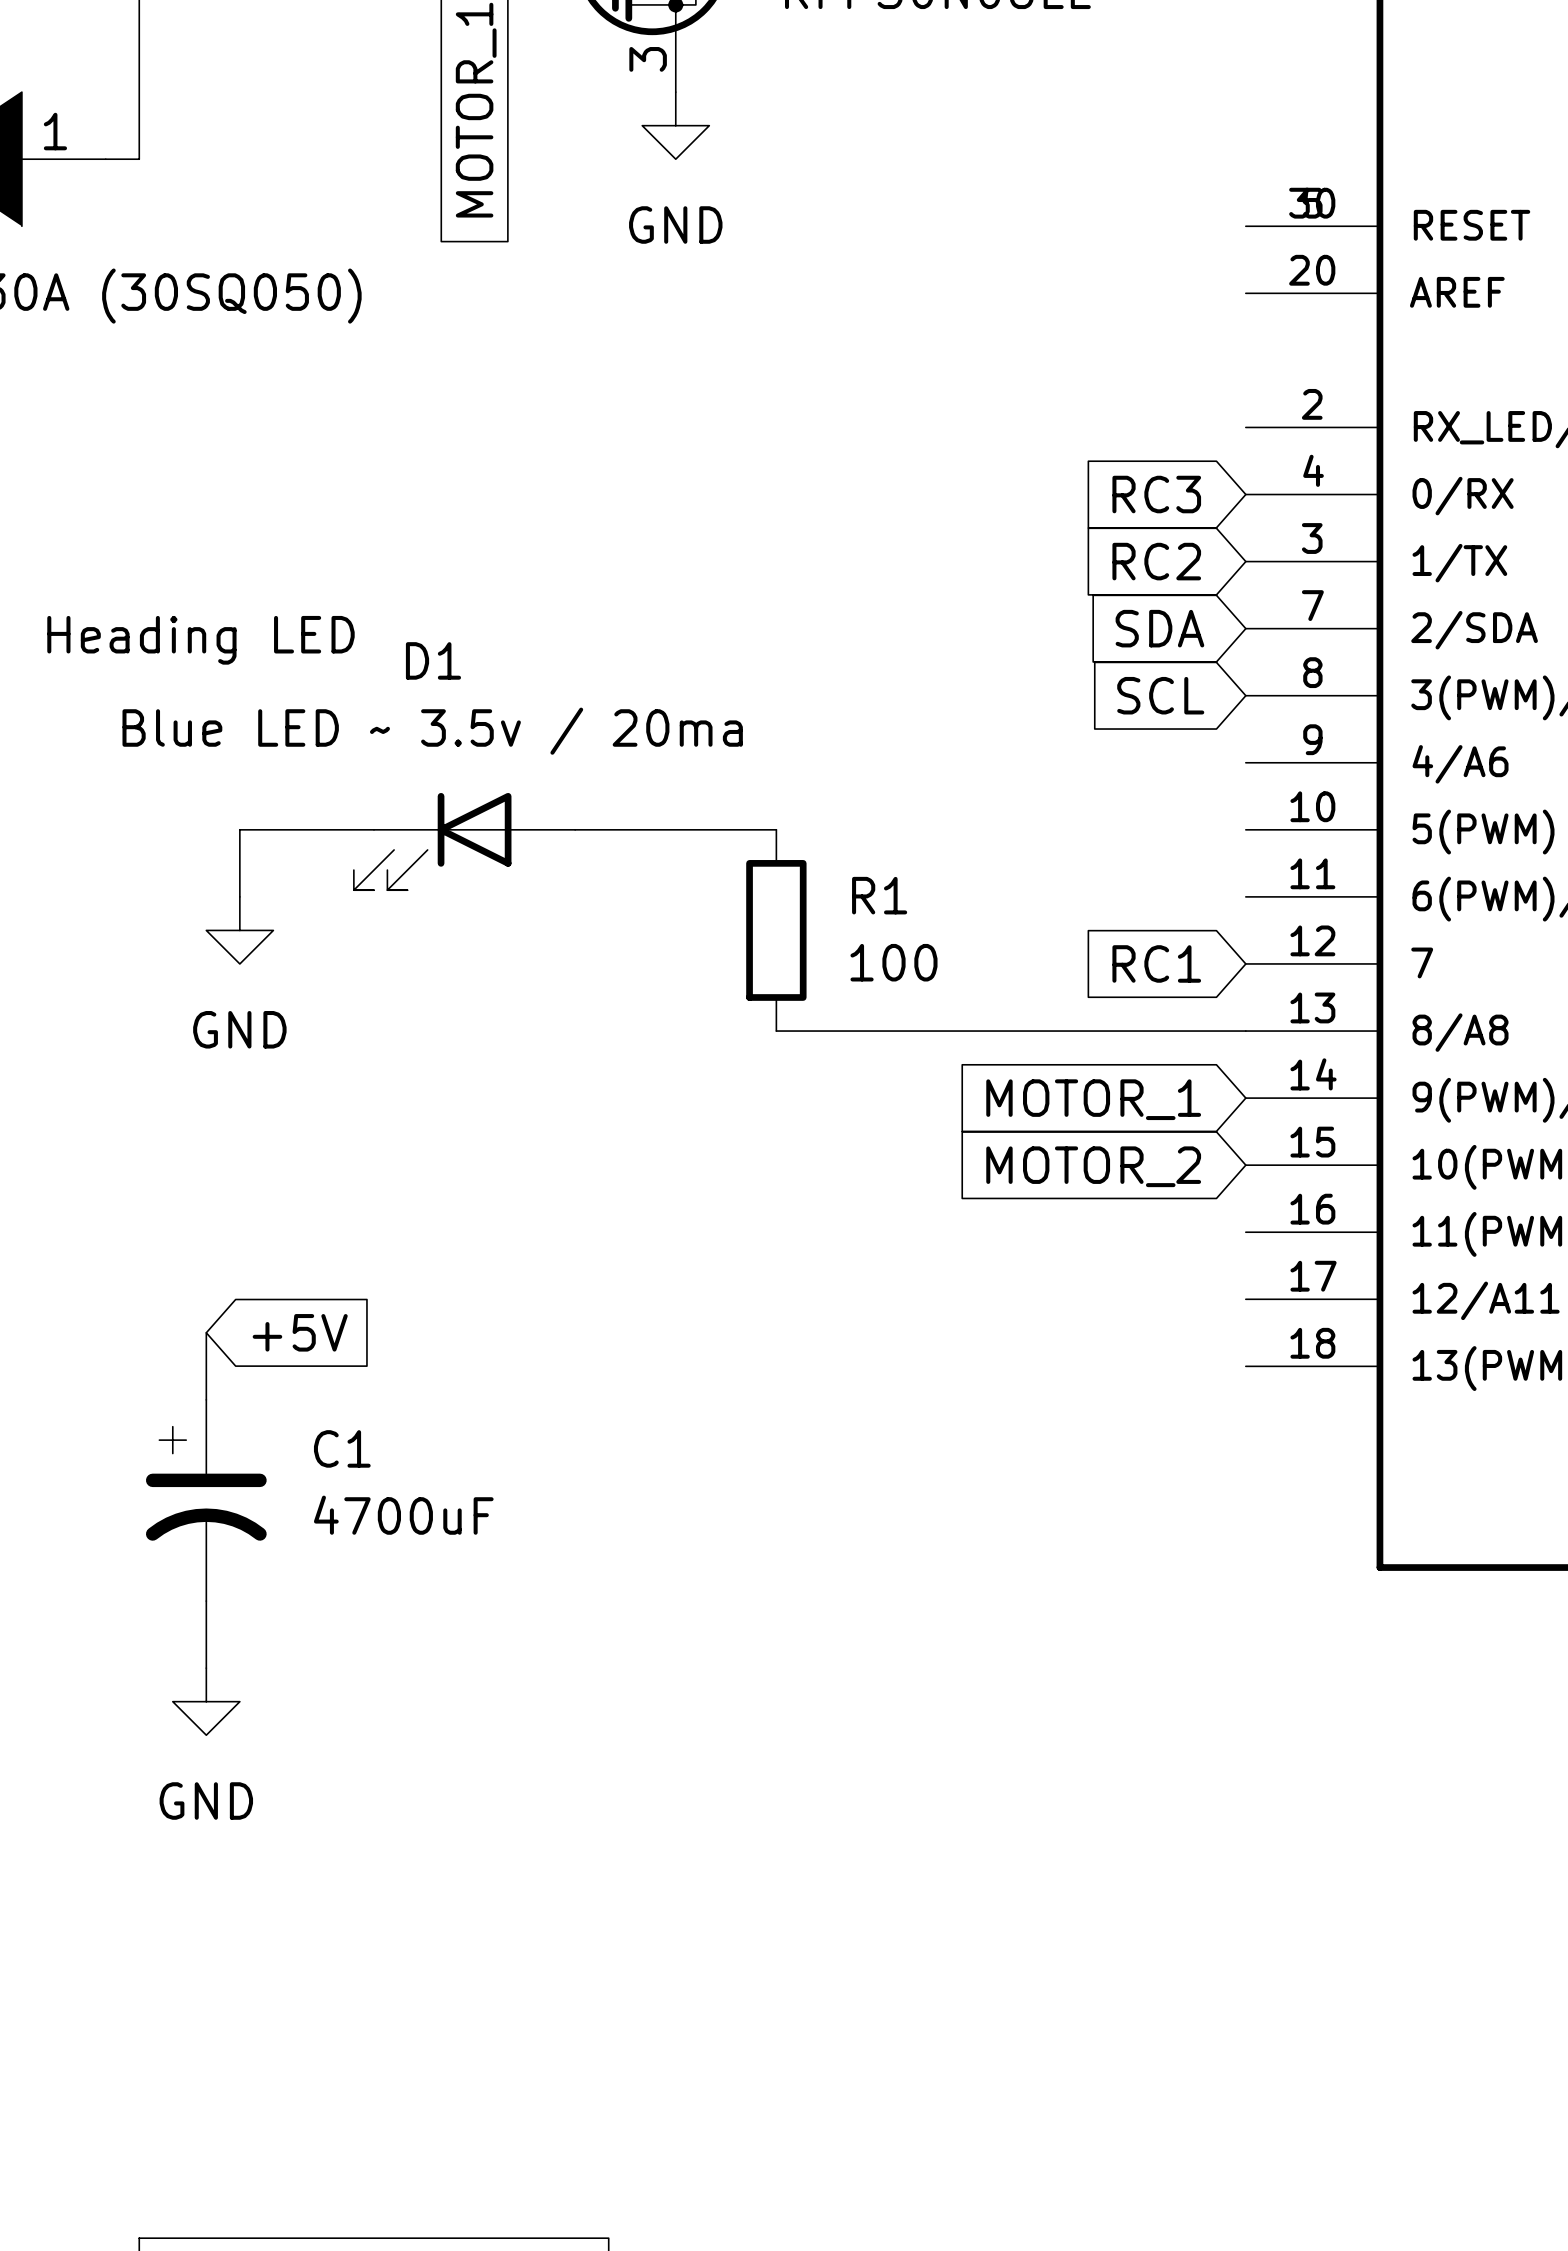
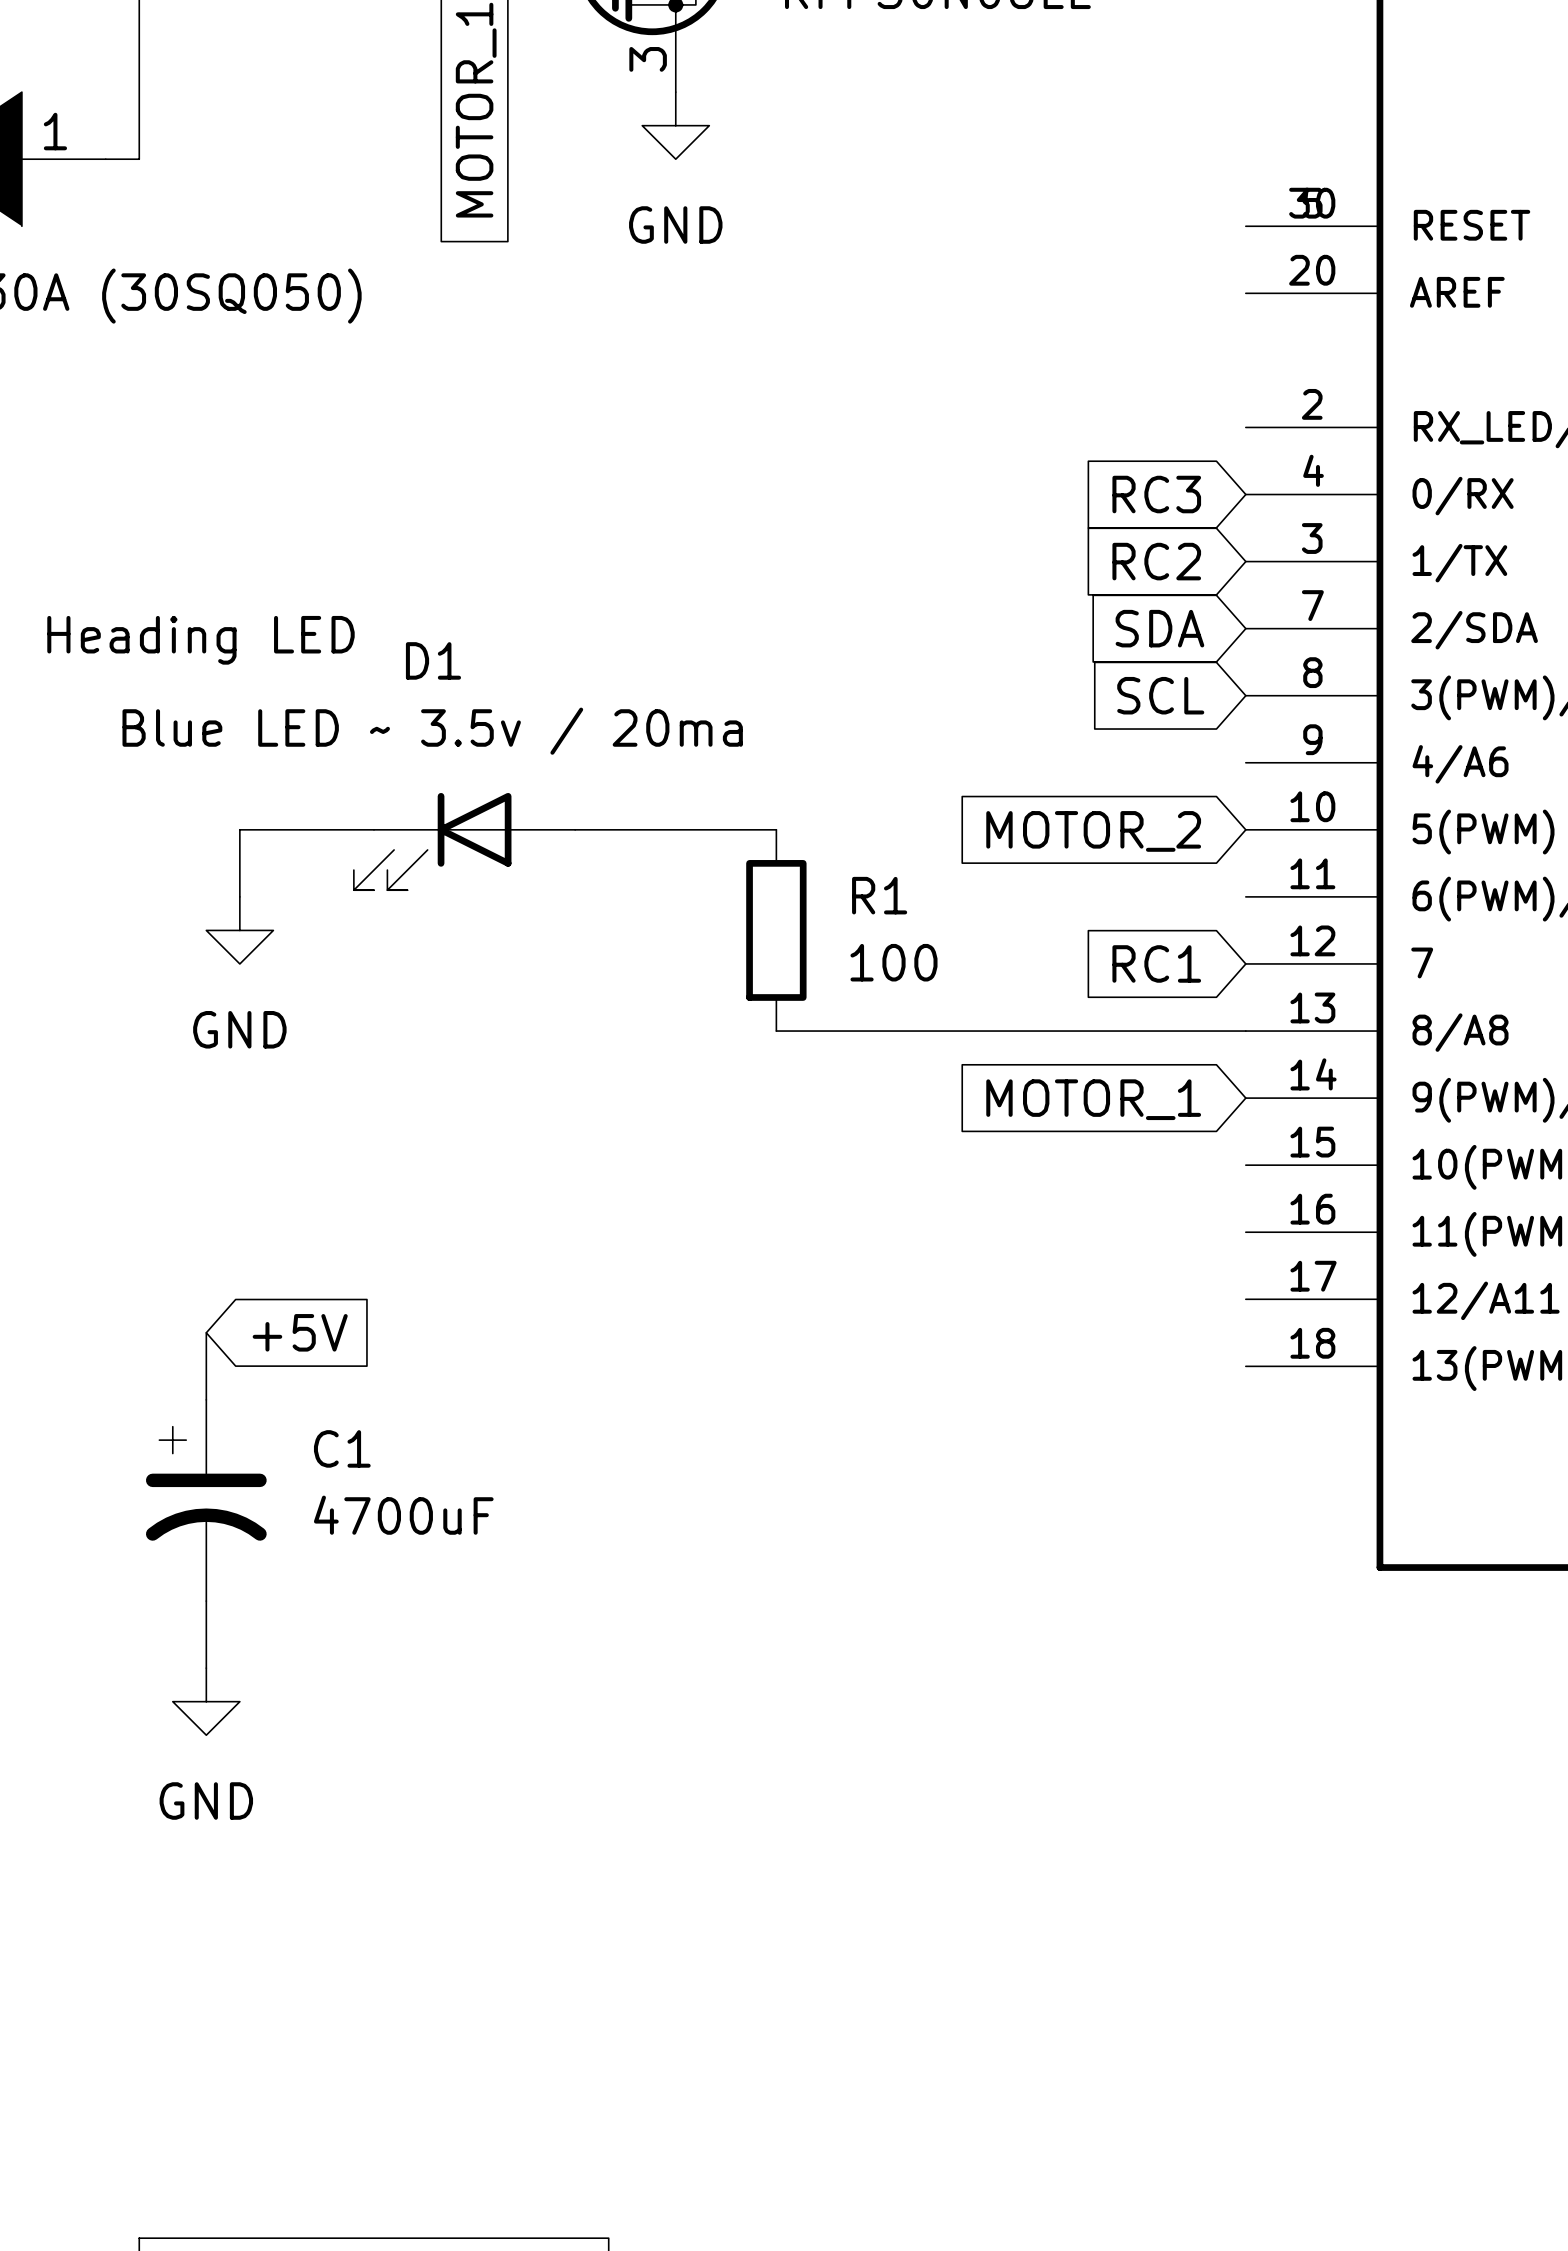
global label position: MOTOR_2 (1093, 1166) -> MOTOR_2 (1093, 831)

